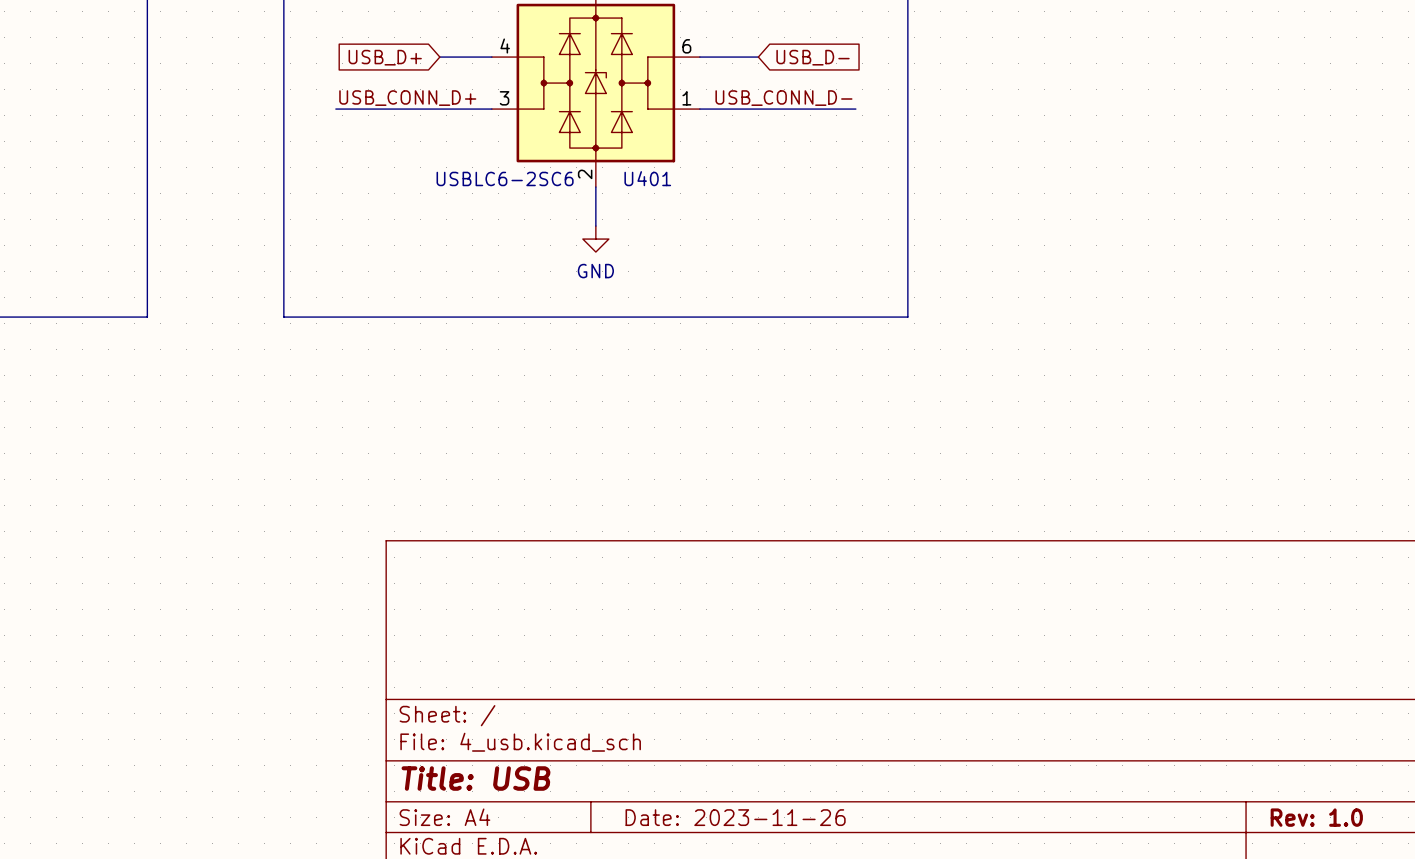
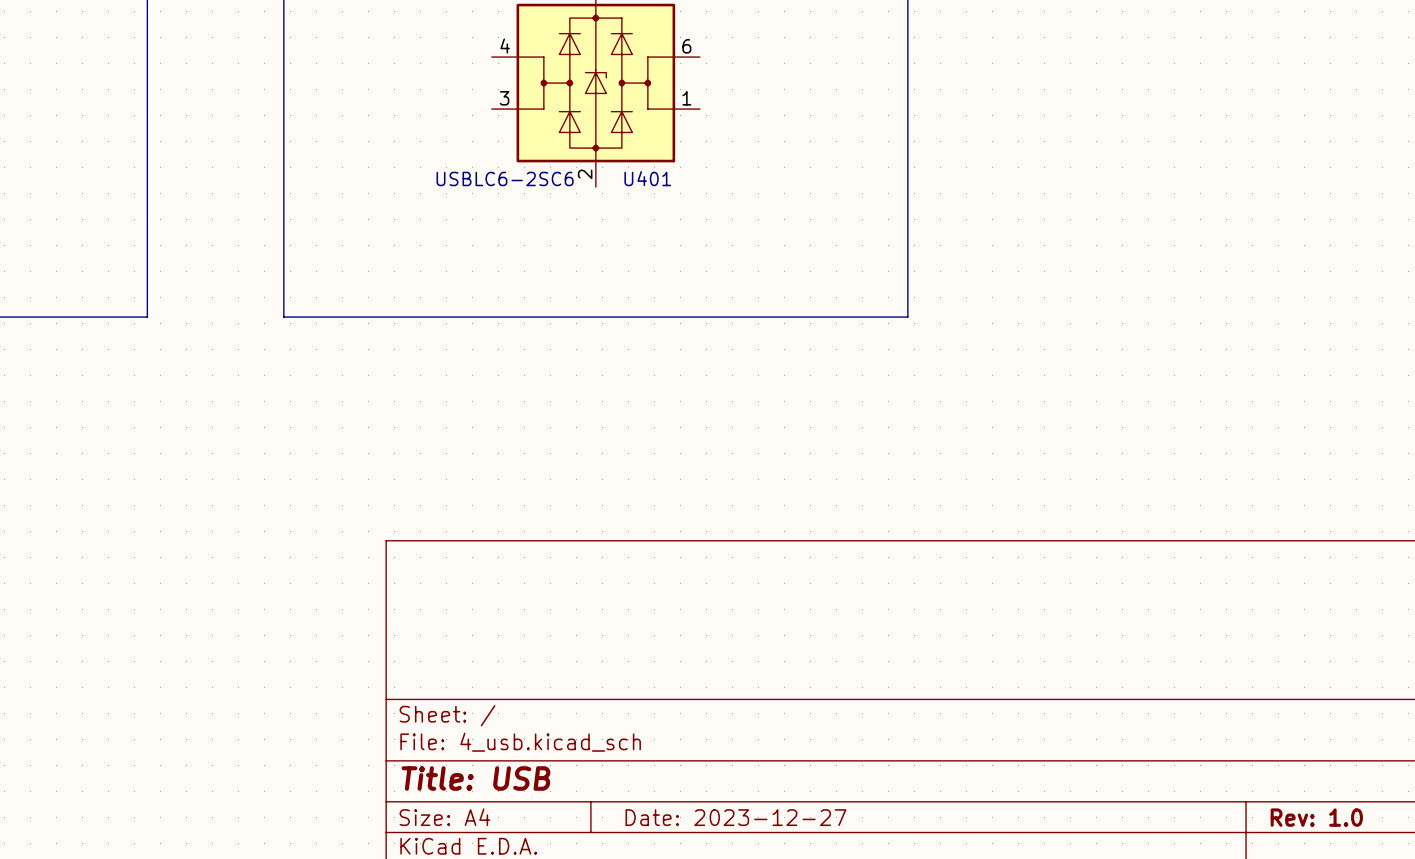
global label: USB_D+ (385, 57) -> none
wire: (439, 57) (491, 57) -> none
wire: (699, 57) (758, 57) -> none
global label: USB_D- (813, 57) -> none
label: USB_CONN_D+ (407, 98) -> none
label: USB_CONN_D- (783, 98) -> none
wire: (335, 109) (491, 109) -> none
wire: (699, 109) (855, 109) -> none
wire: (595, 187) (595, 226) -> none
power symbol: GND (595, 239) -> none
title block: Date: 2023-11-26 (735, 817) -> Date: 2023-12-27 (735, 817)

